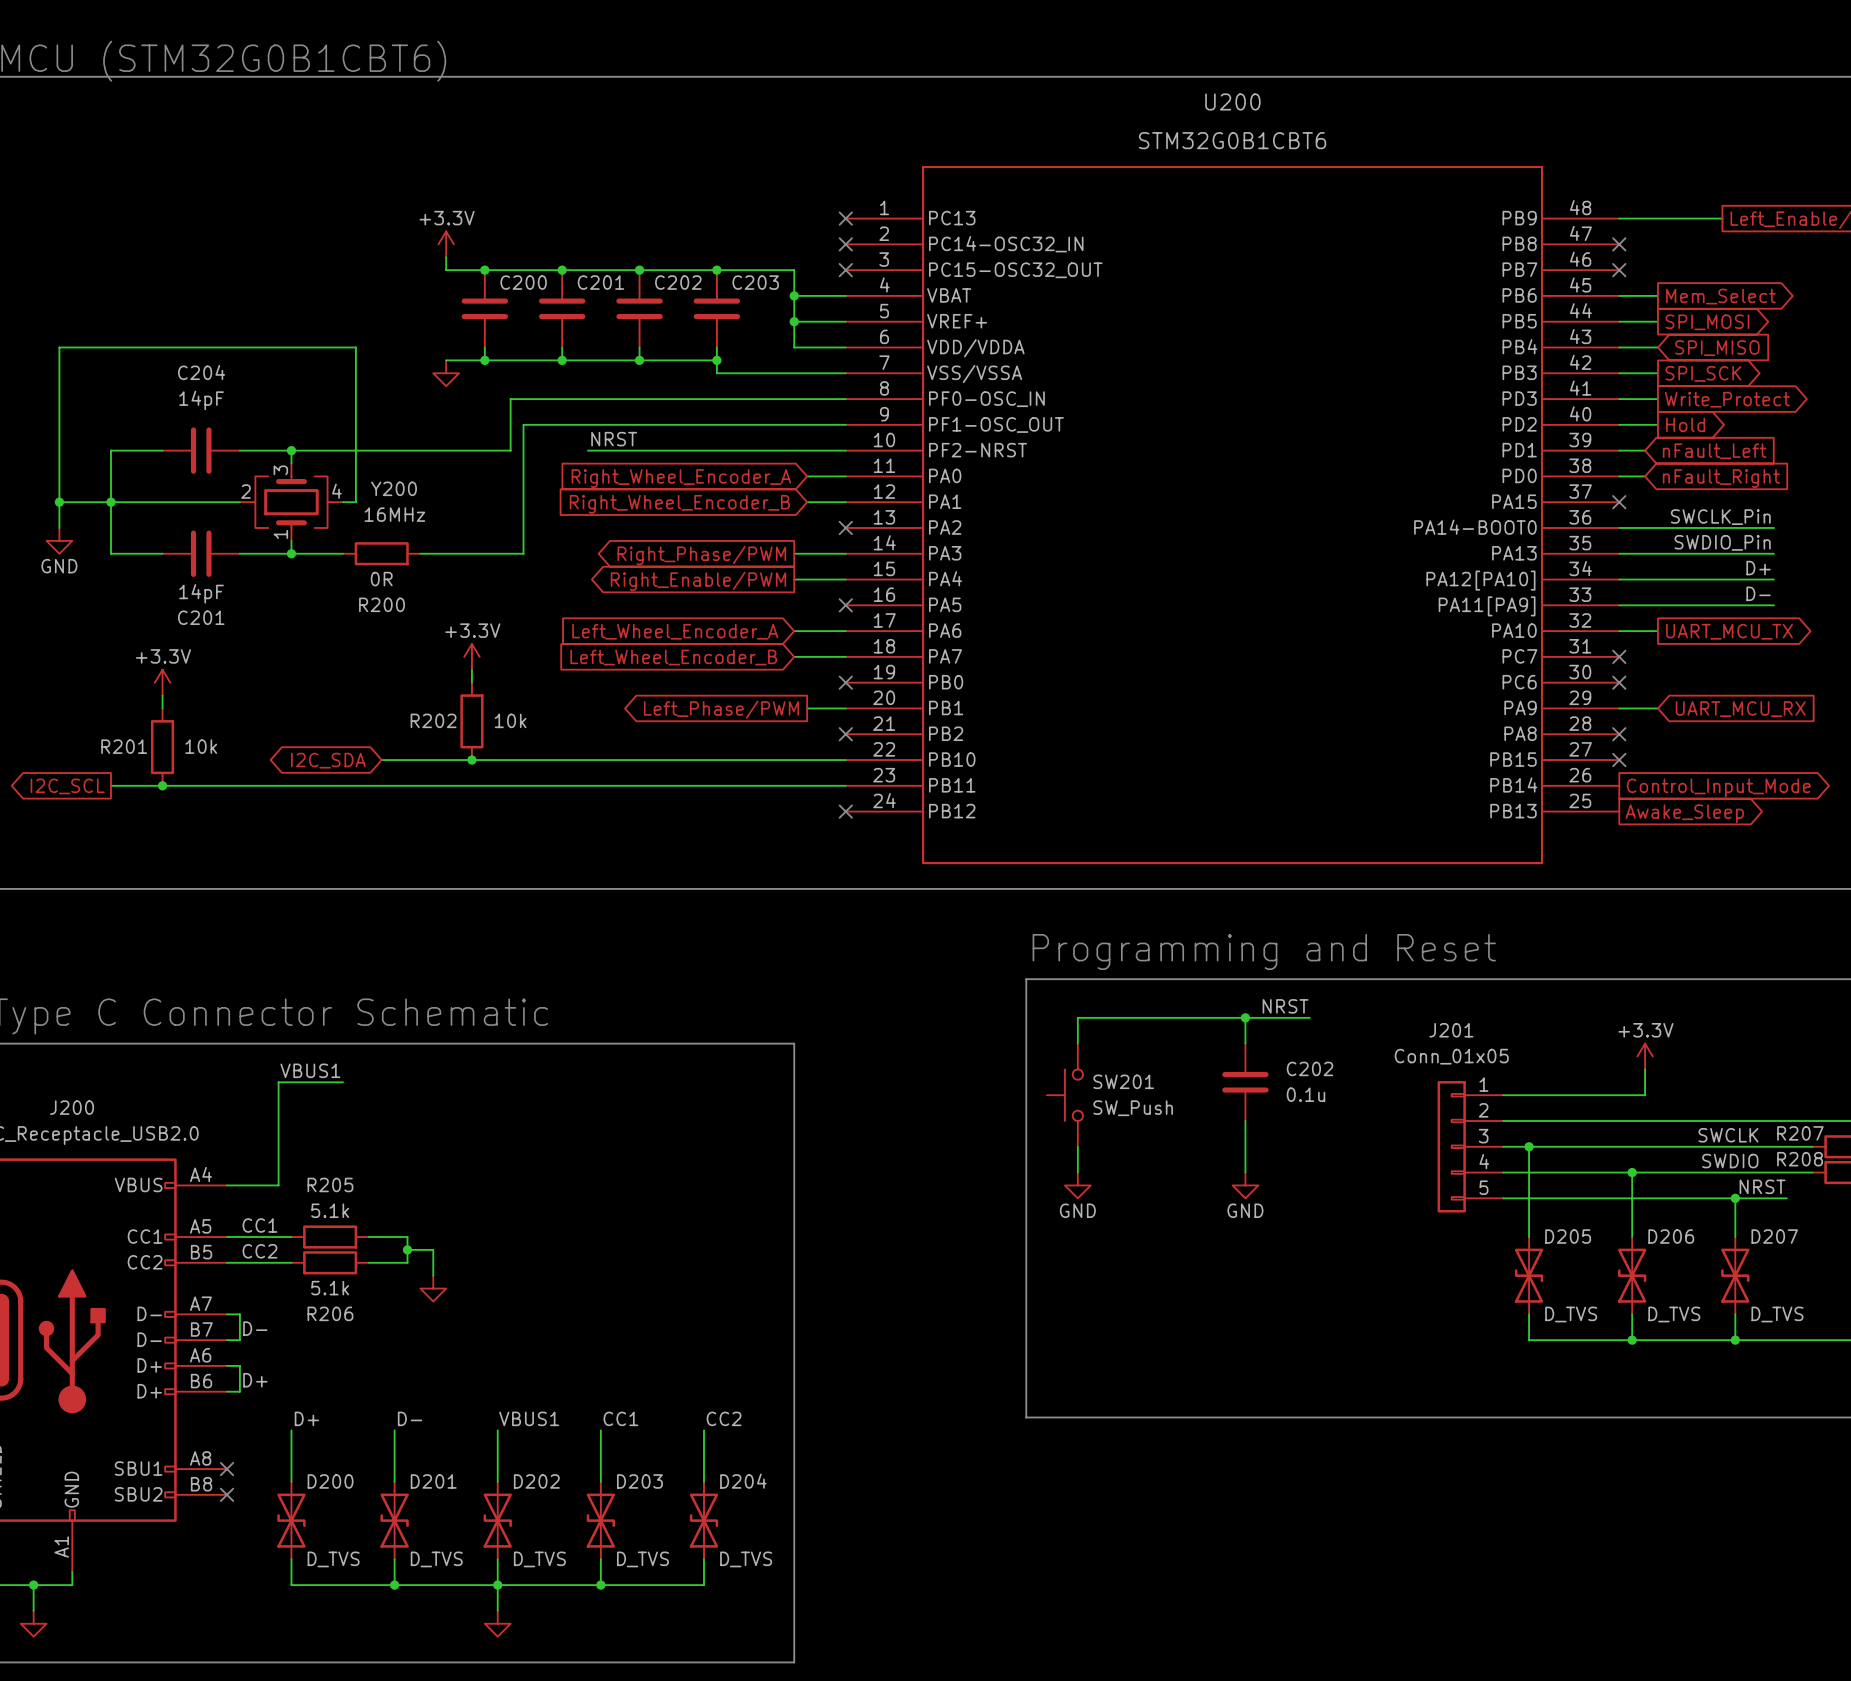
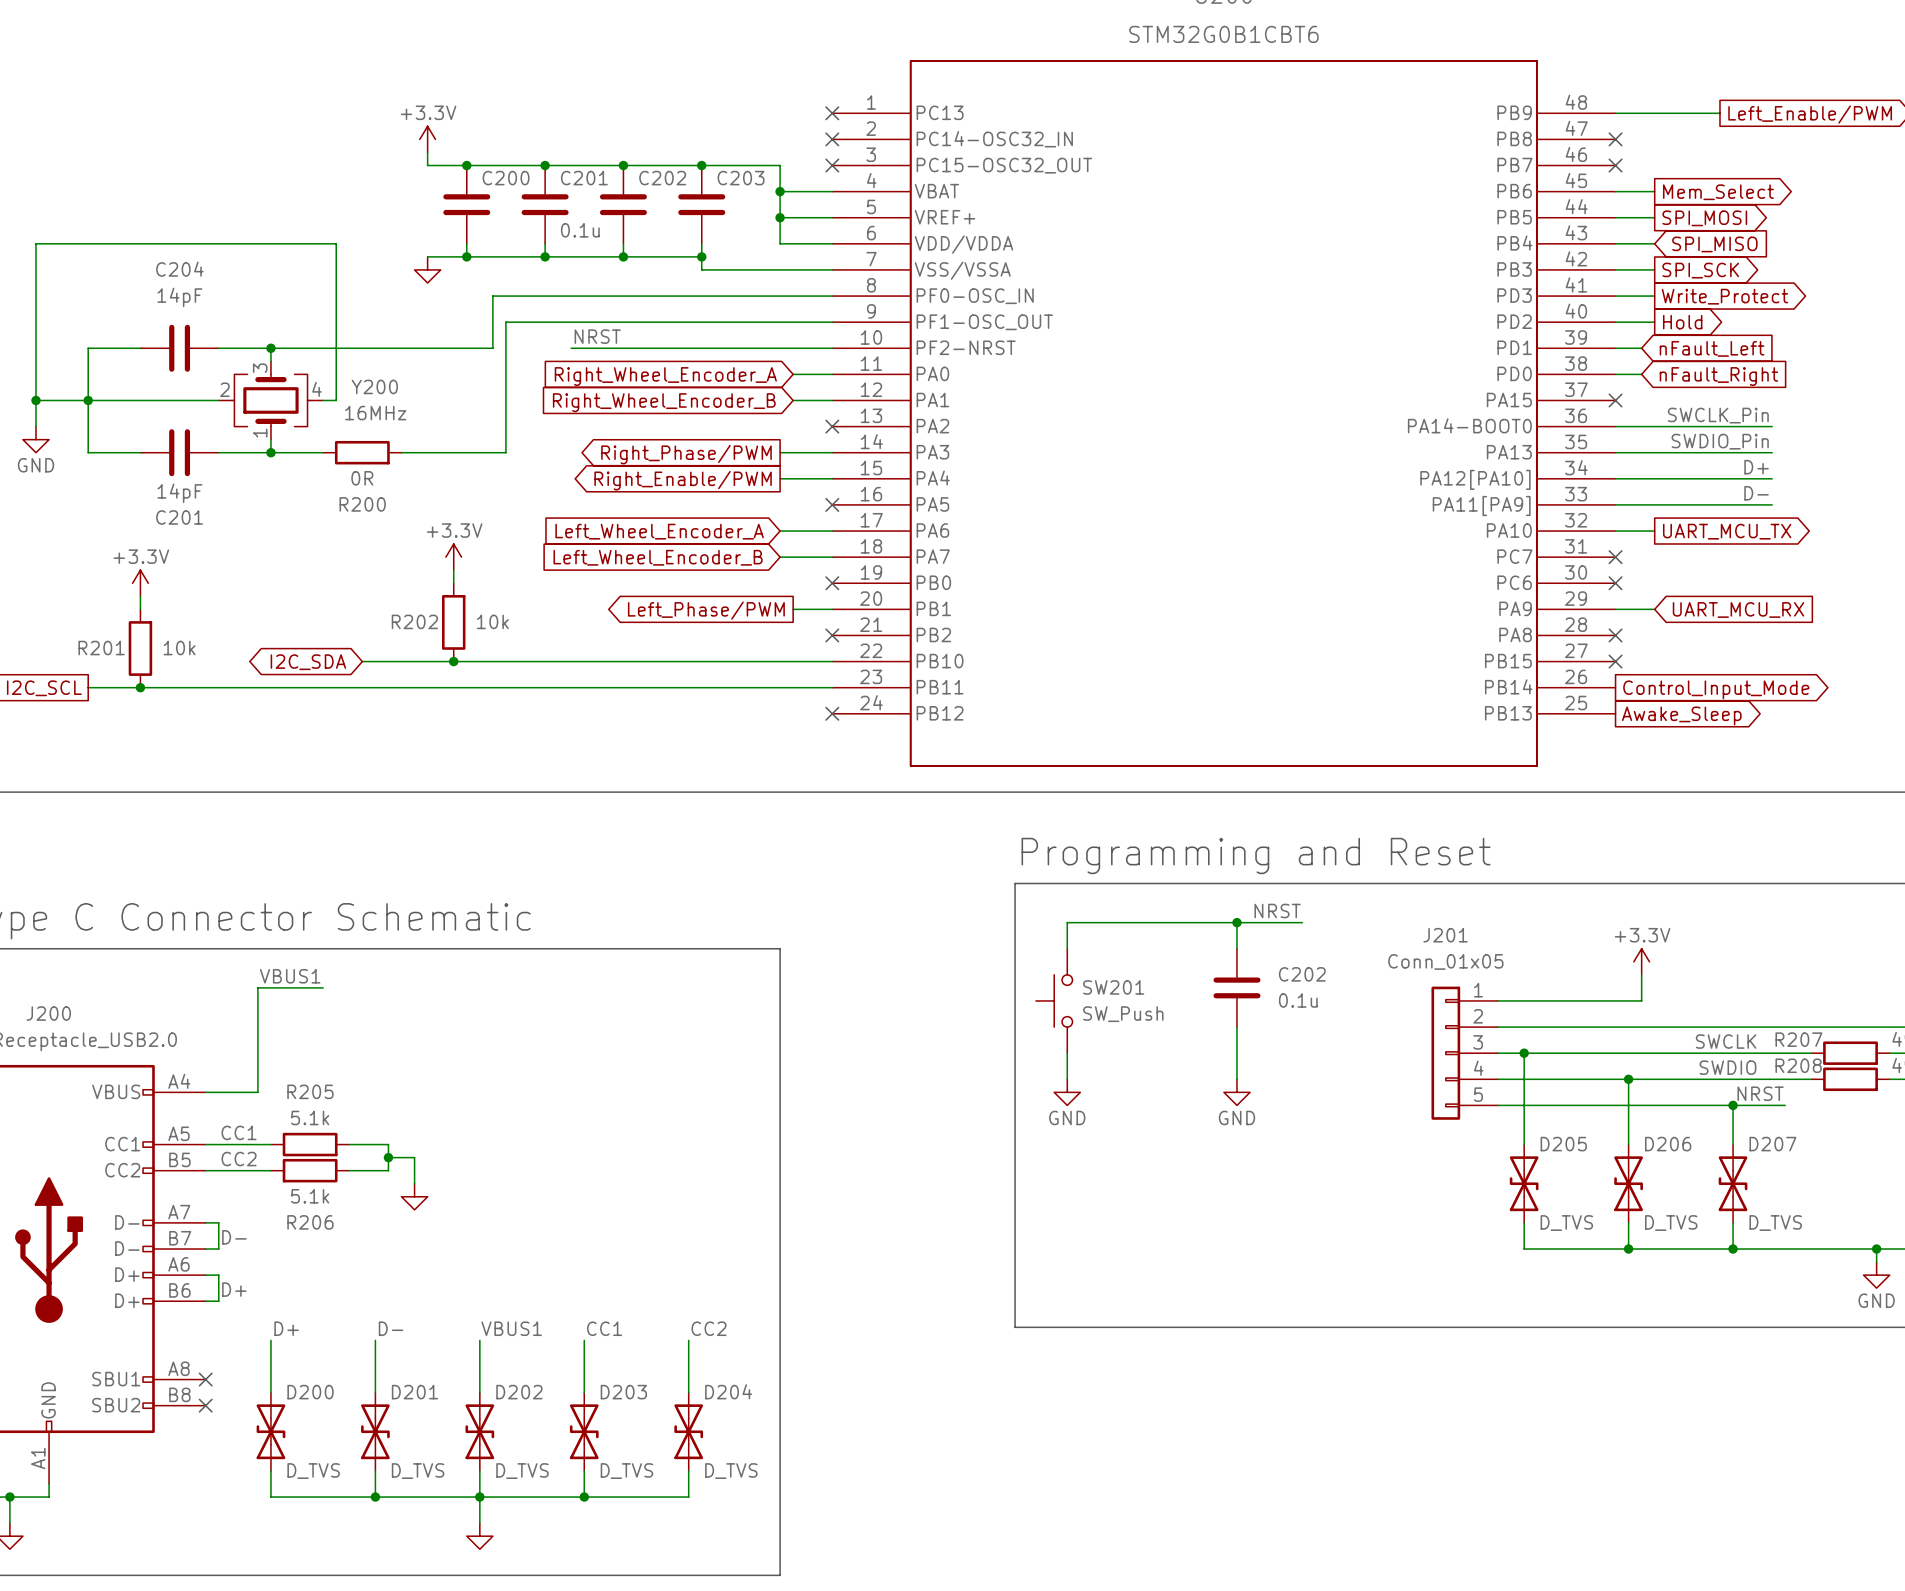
C201 value: none -> 0.1u (580, 230)

